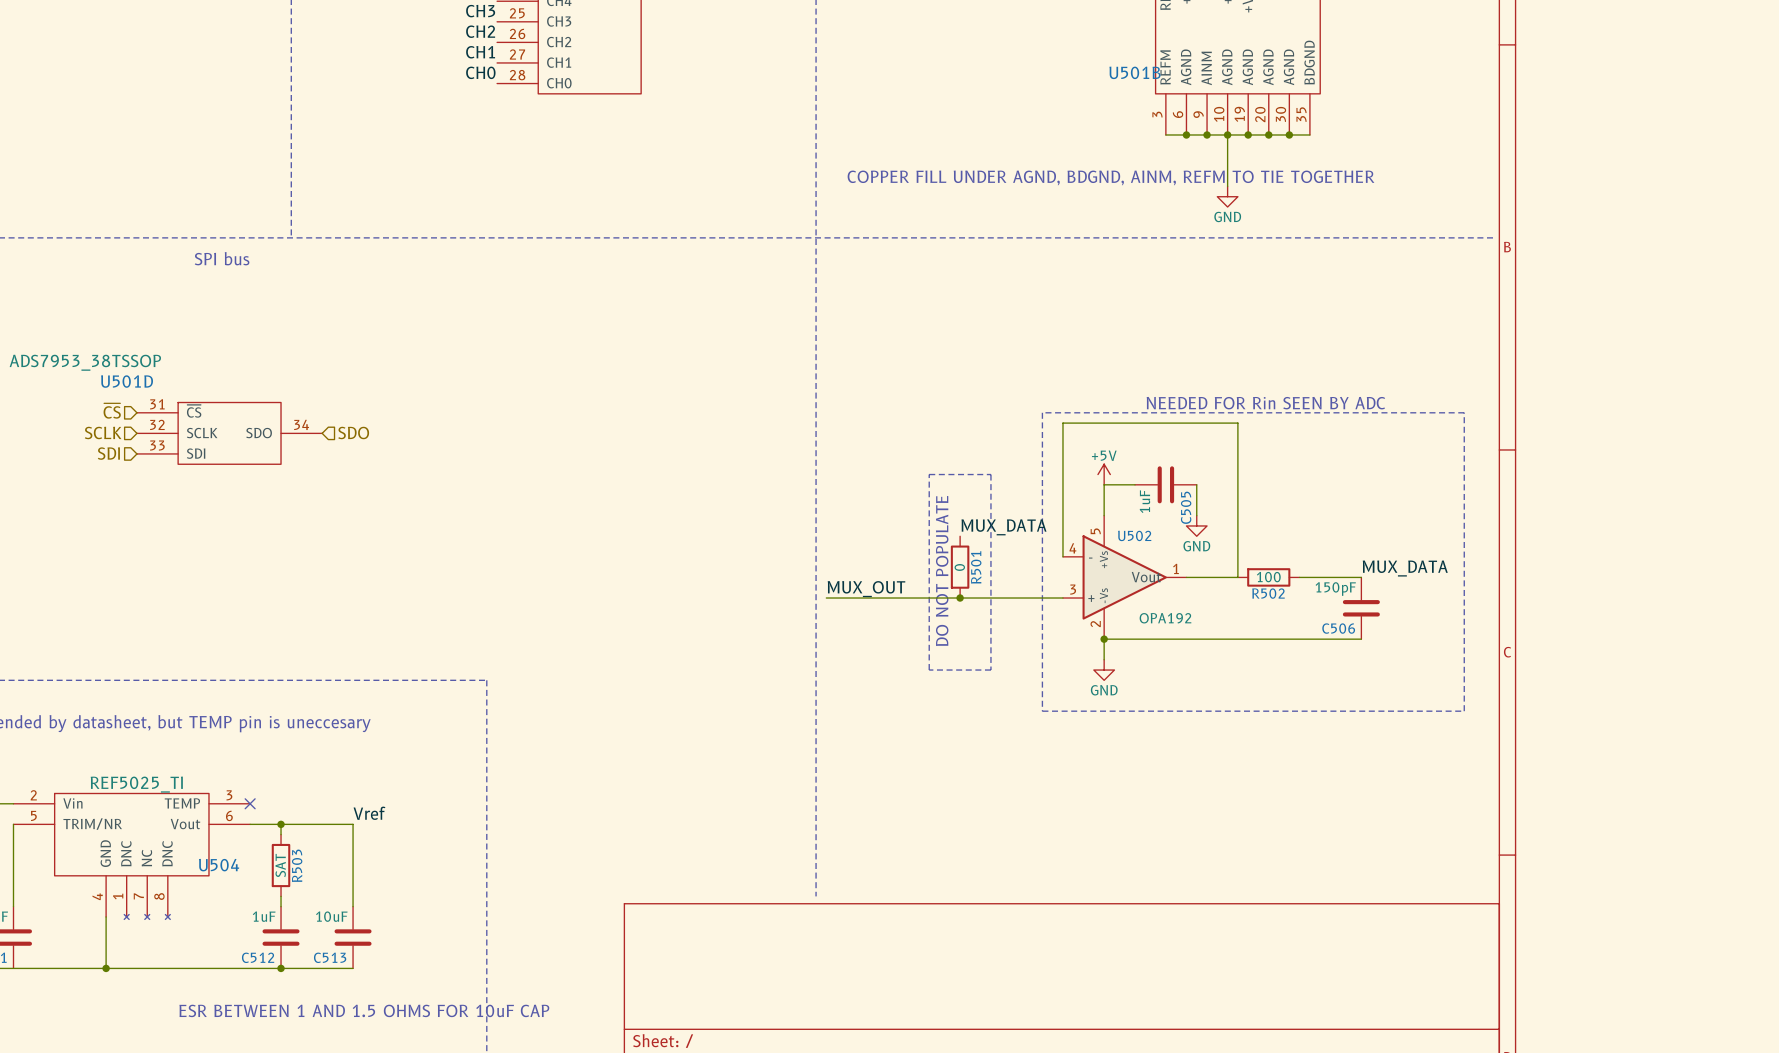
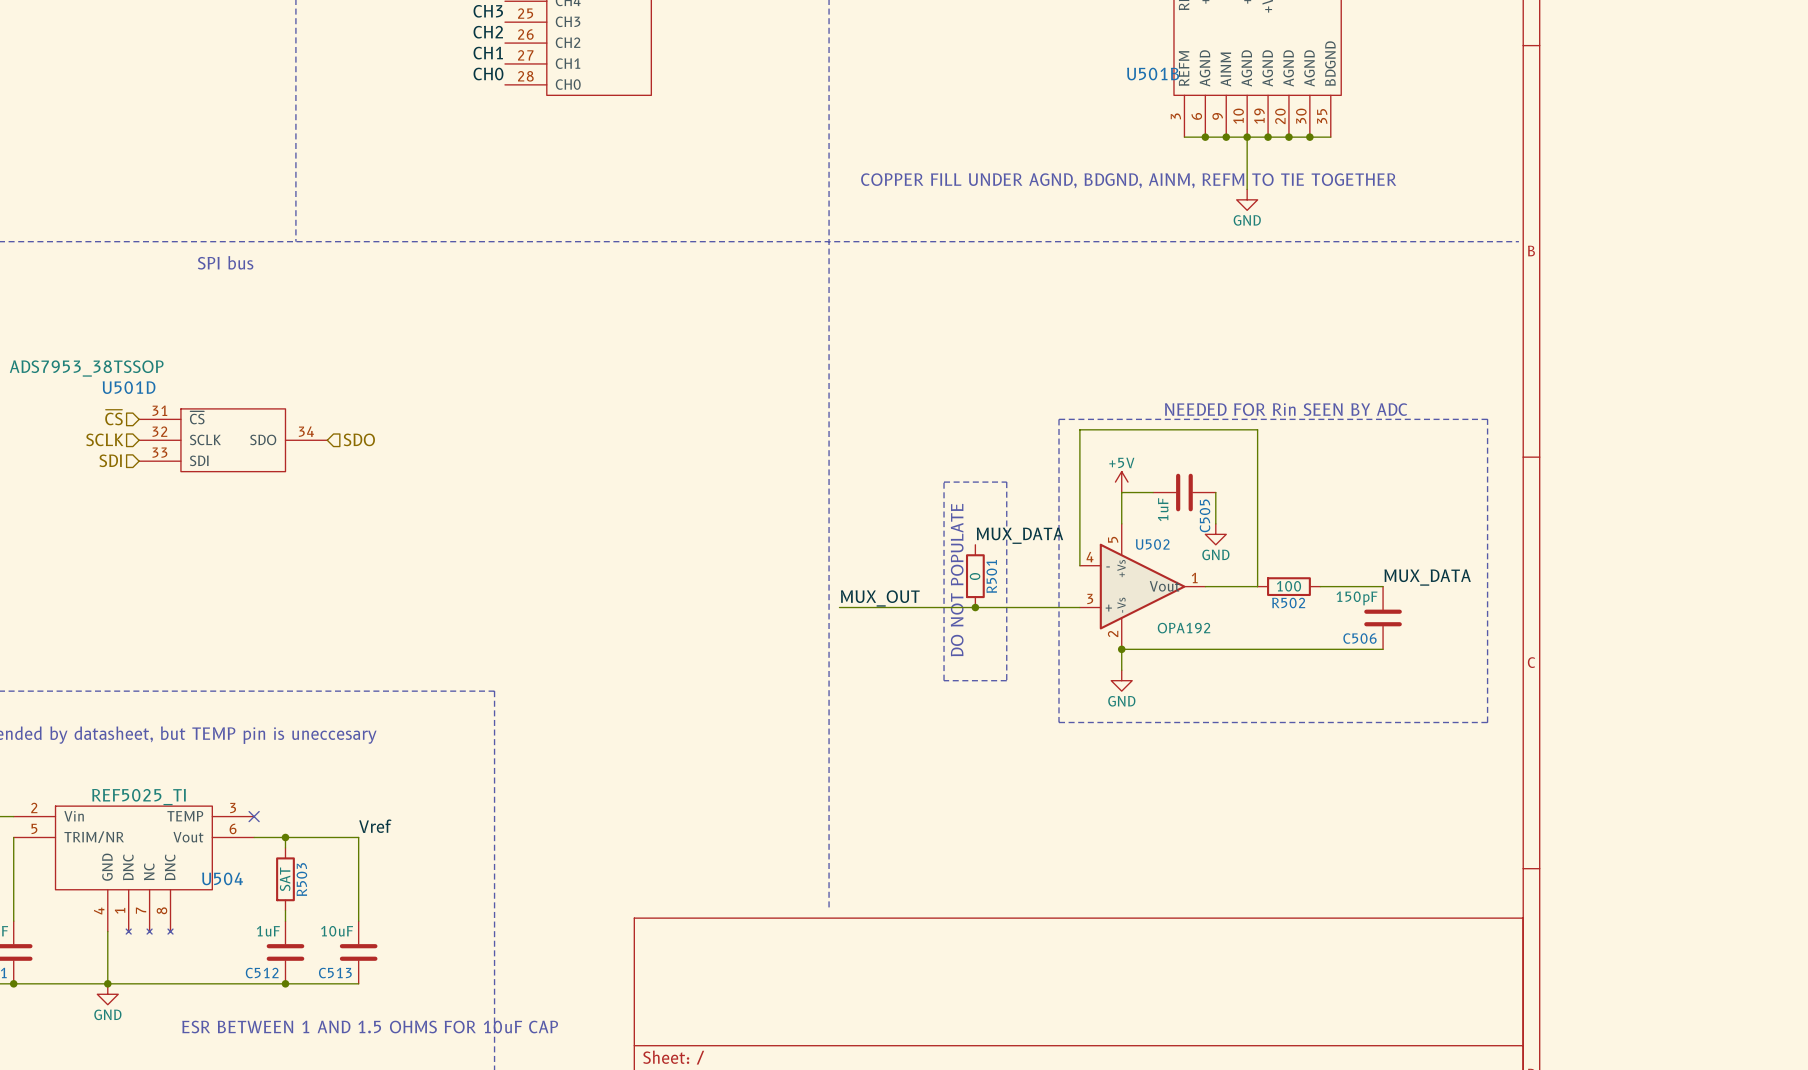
junction: none -> (13, 983)
power symbol: none -> GND (107, 994)

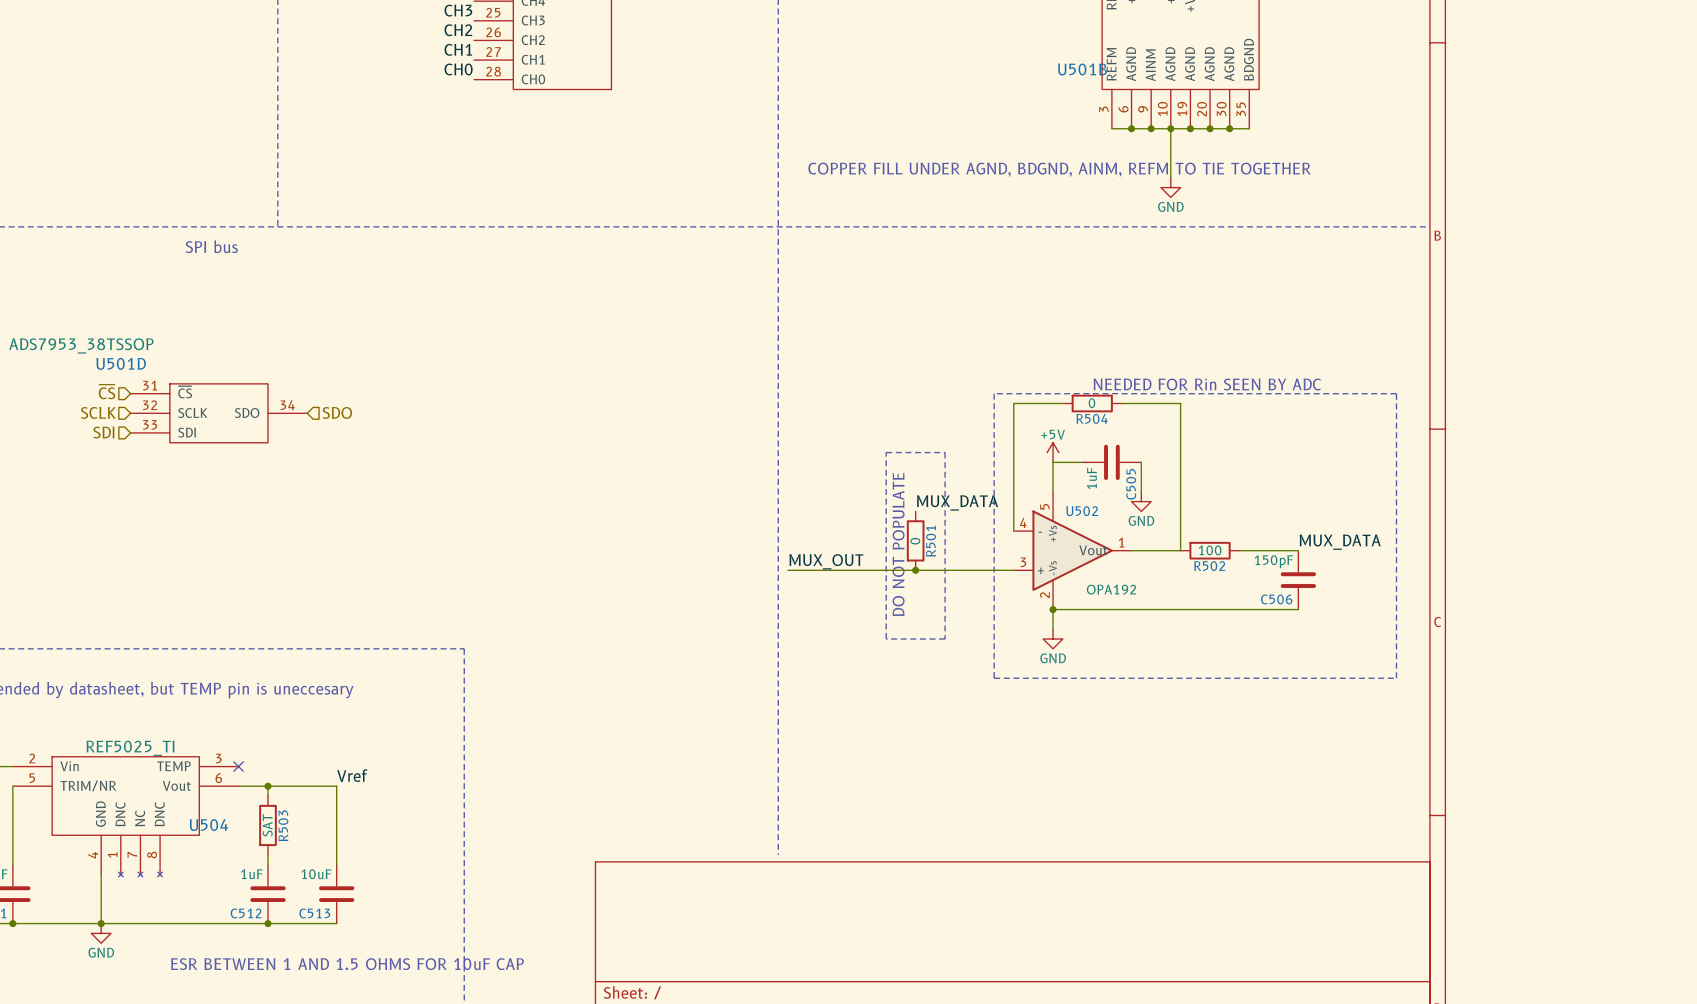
wire: (1132, 429) (1194, 429) -> none
R504: none -> 0 (1092, 403)

